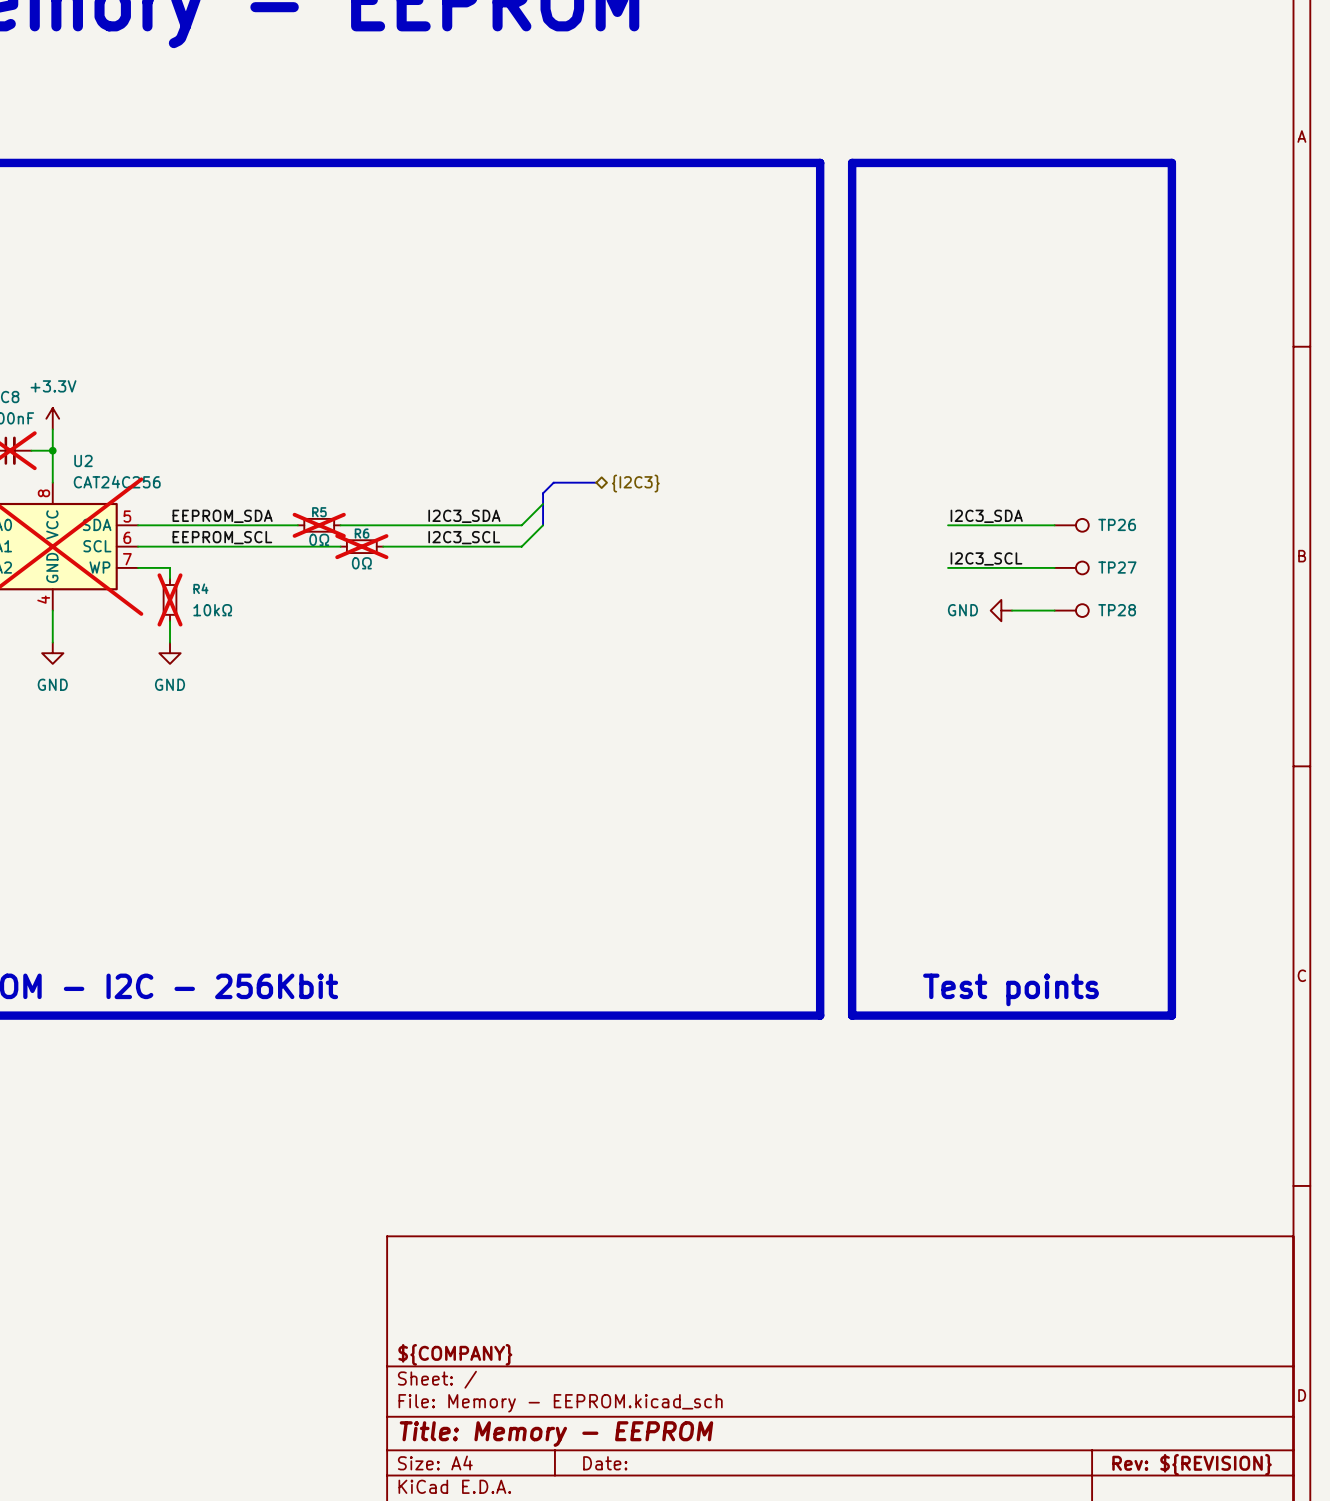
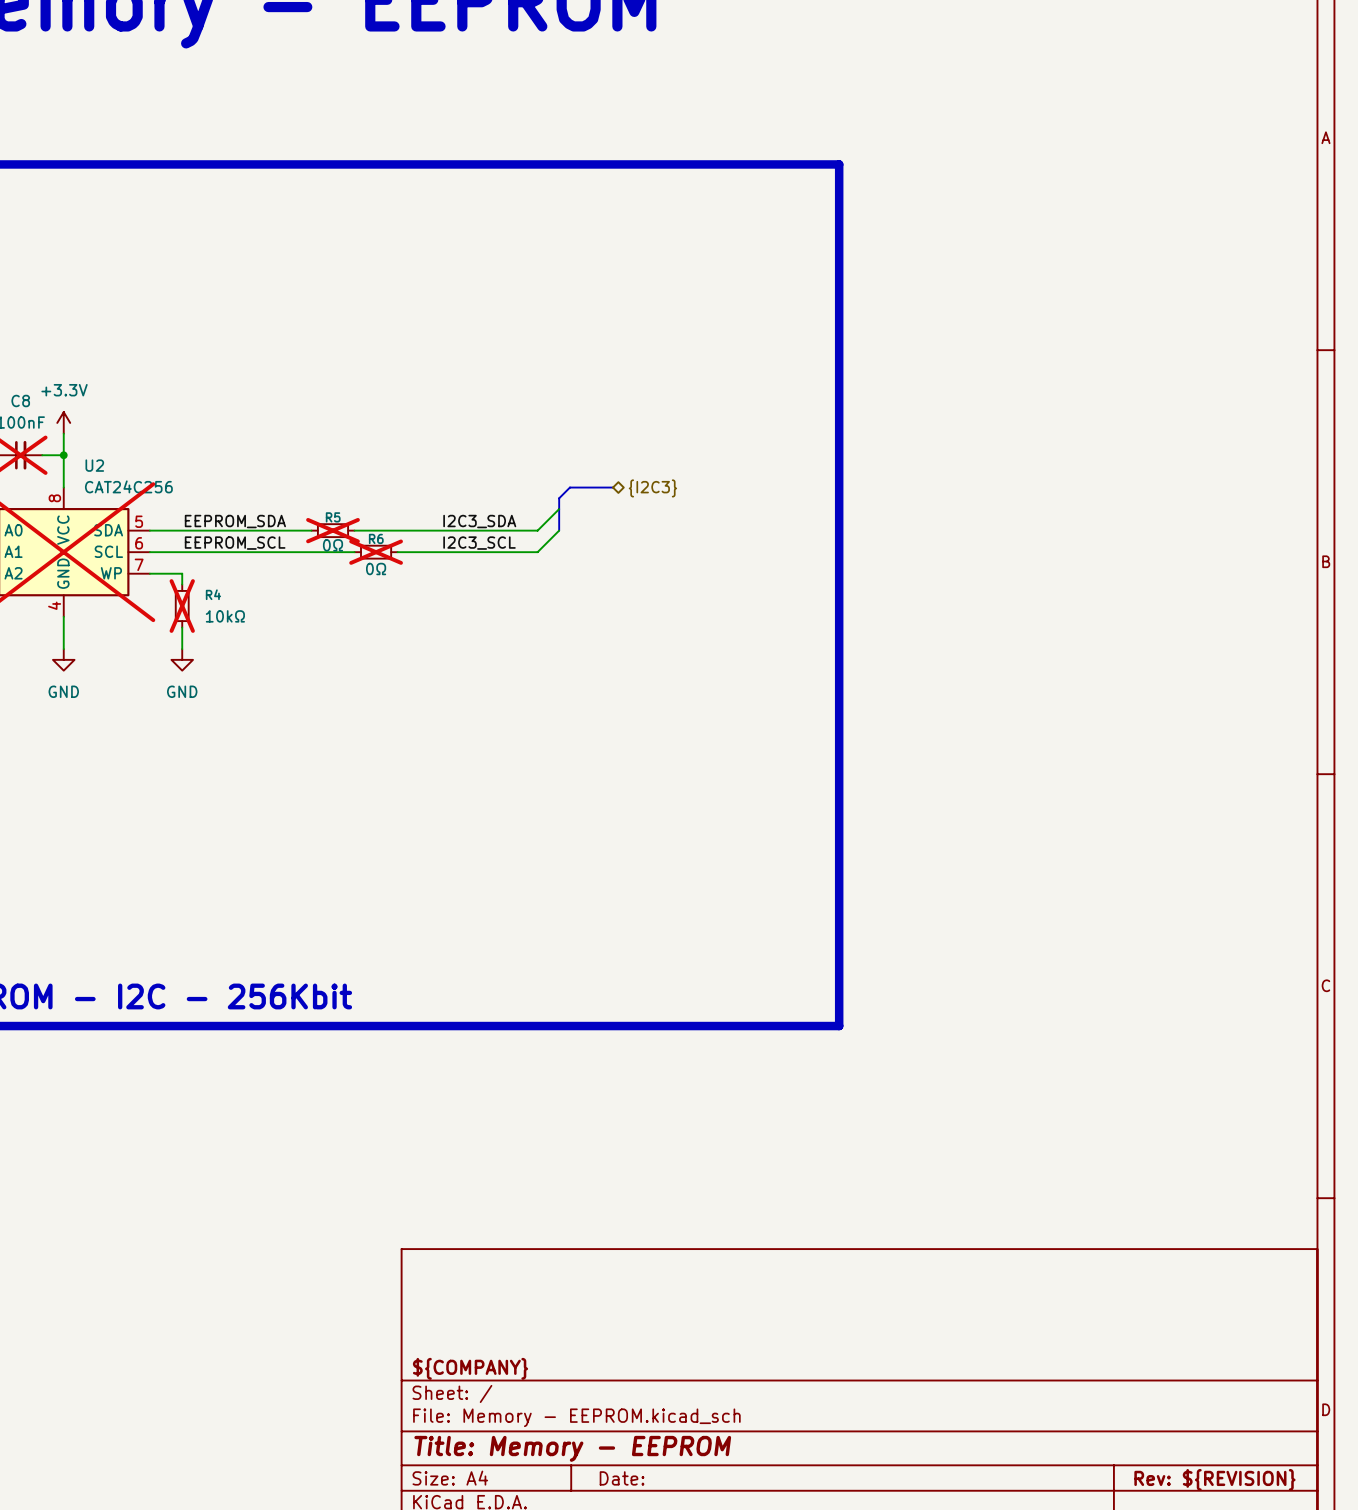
line: (852, 162) (1171, 162) (1171, 1015) (852, 1015) (852, 162) -> none
label: I2C3_SDA (986, 516) -> none
wire: (948, 525) (1054, 525) -> none
TP26: (1071, 525) -> none
label: I2C3_SCL (986, 558) -> none
wire: (948, 567) (1054, 567) -> none
TP27: (1071, 567) -> none
power symbol: GND (1001, 610) -> none
wire: (1012, 610) (1054, 610) -> none
TP28: (1071, 610) -> none
text: Test points (1011, 989) -> none

